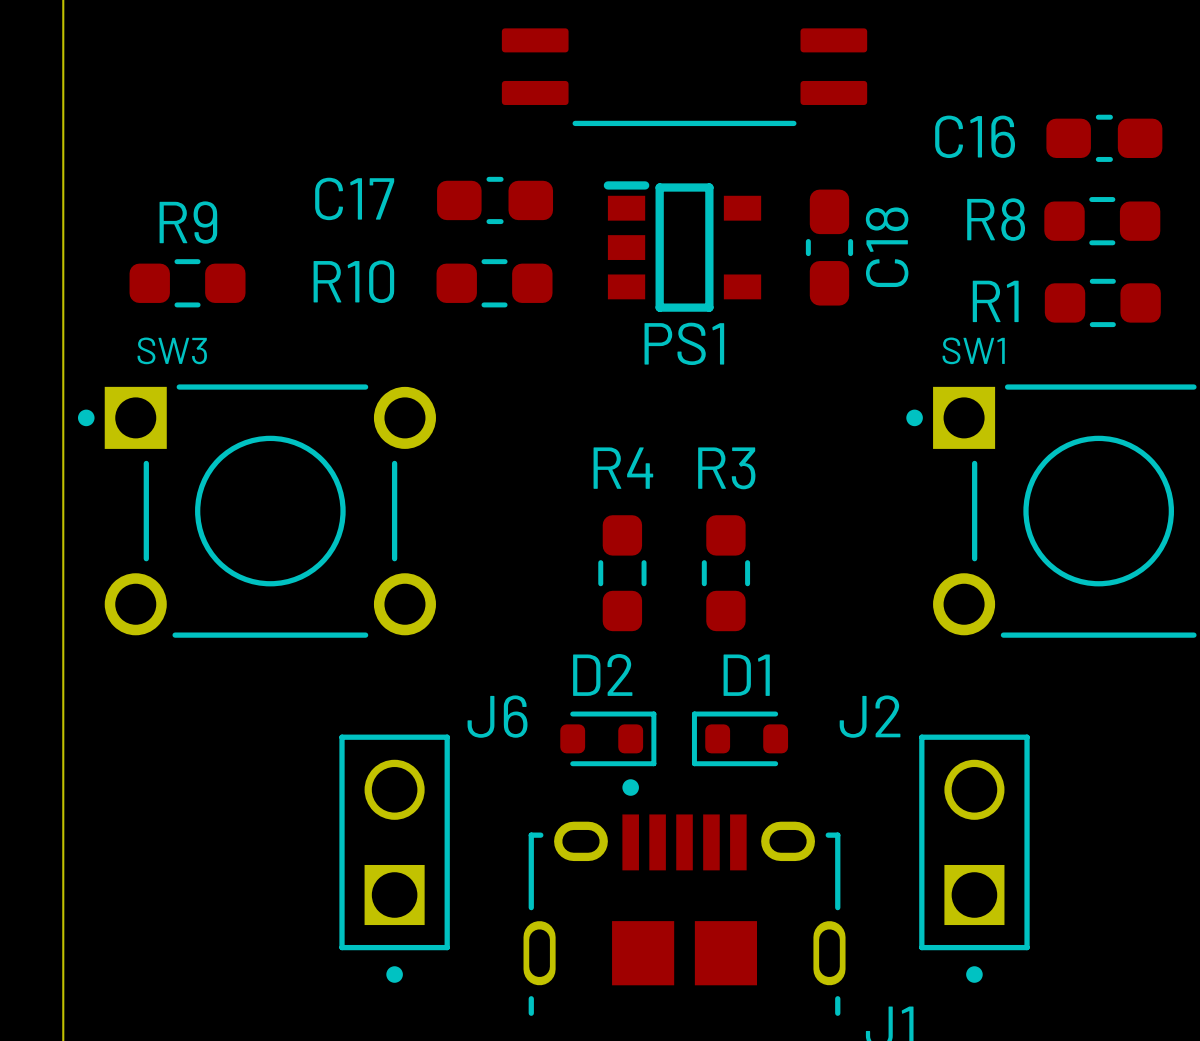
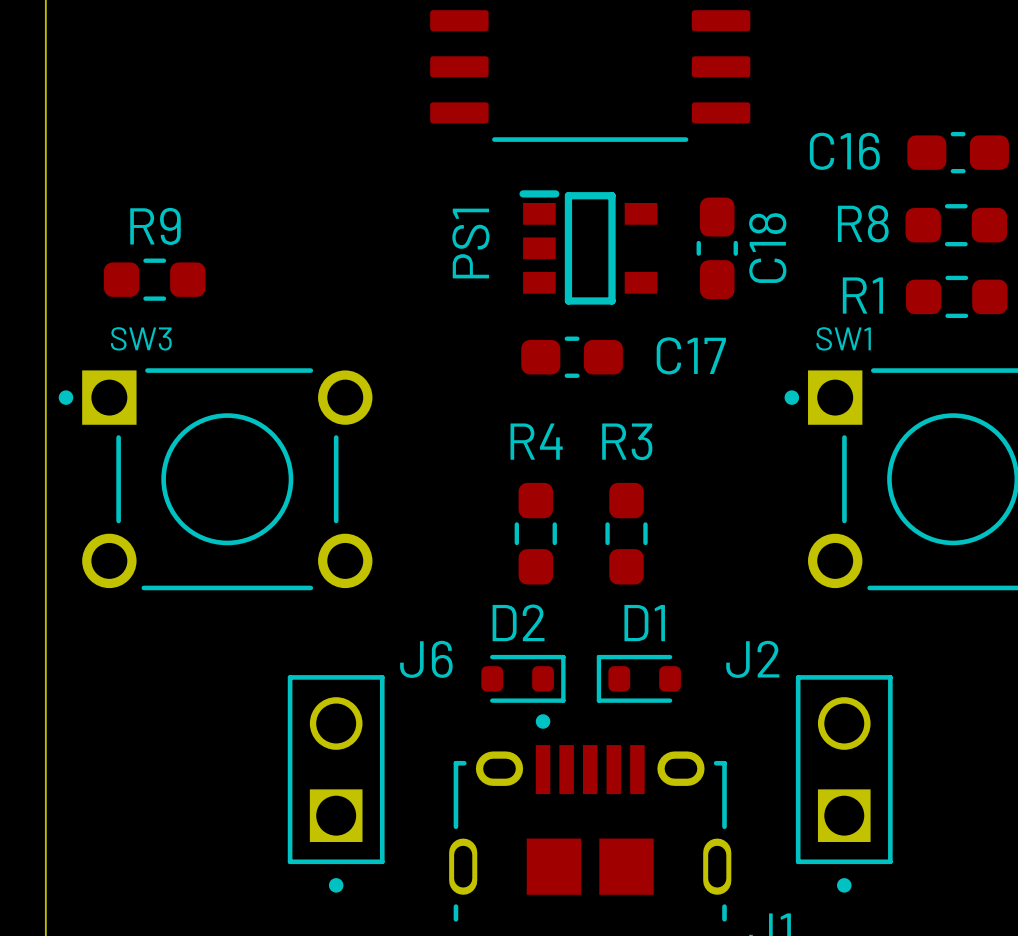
C17 name position: C17 (354, 198) -> C17 (691, 355)
C17 position: (495, 200) -> (572, 357)
R10: (494, 283) -> none
PS1 name rotation: 0° (684, 343) -> 90° counterclockwise (470, 243)
PS1 name position: PS1 (684, 343) -> PS1 (470, 243)

